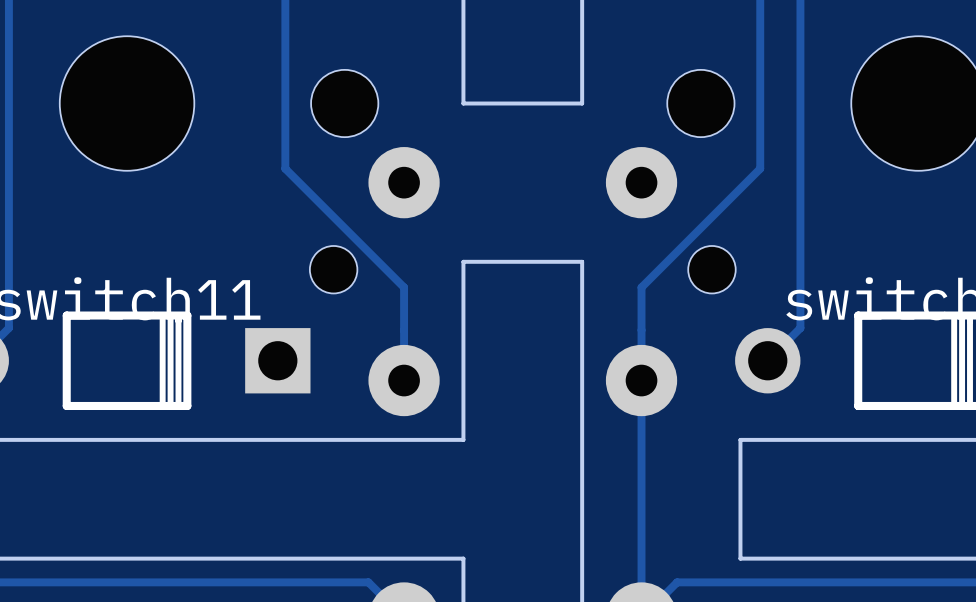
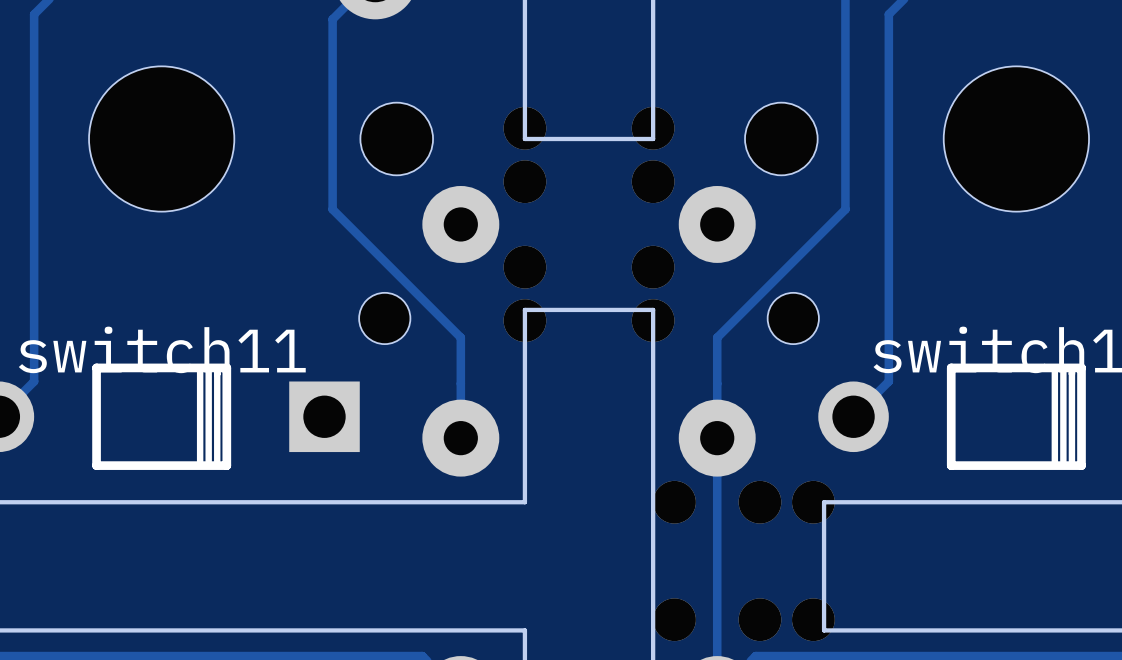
part: none -> (524, 224)
part: none -> (653, 224)
part: none -> (743, 502)
part: none -> (743, 619)

